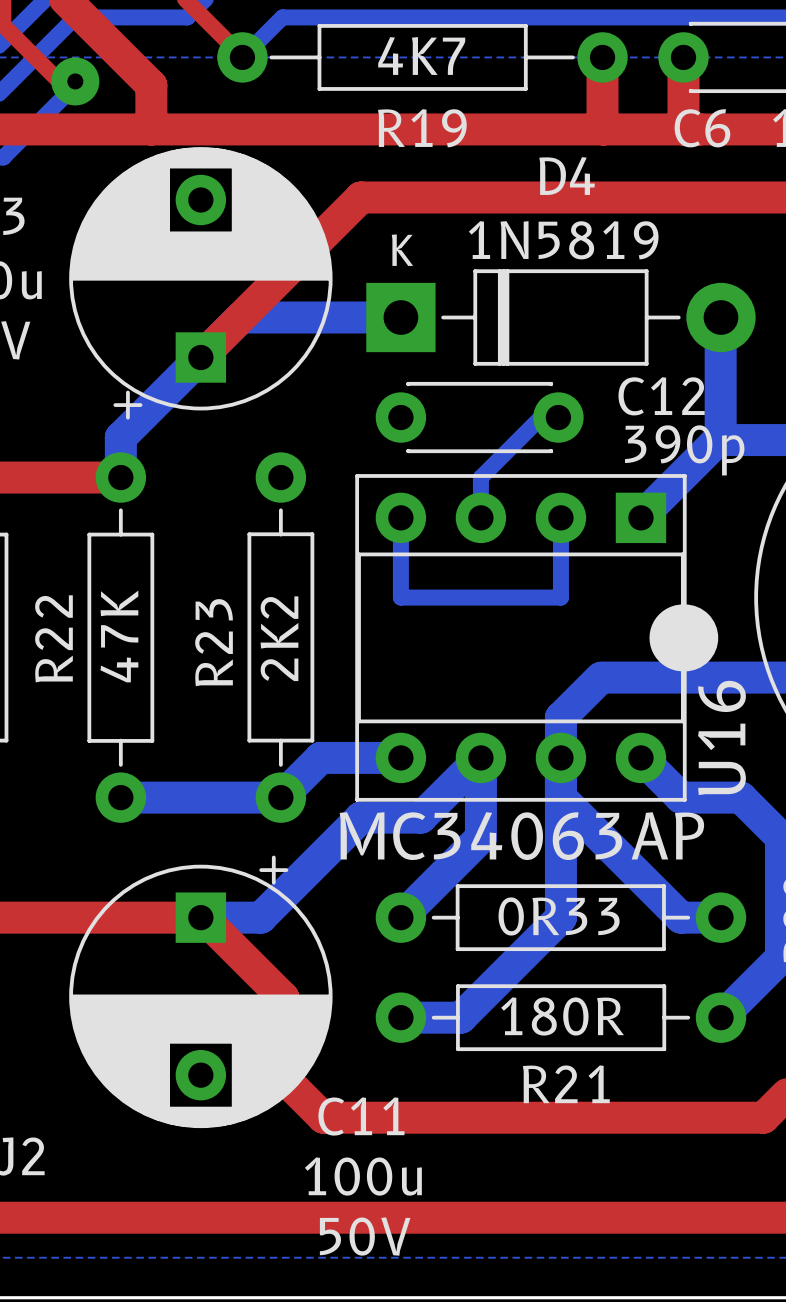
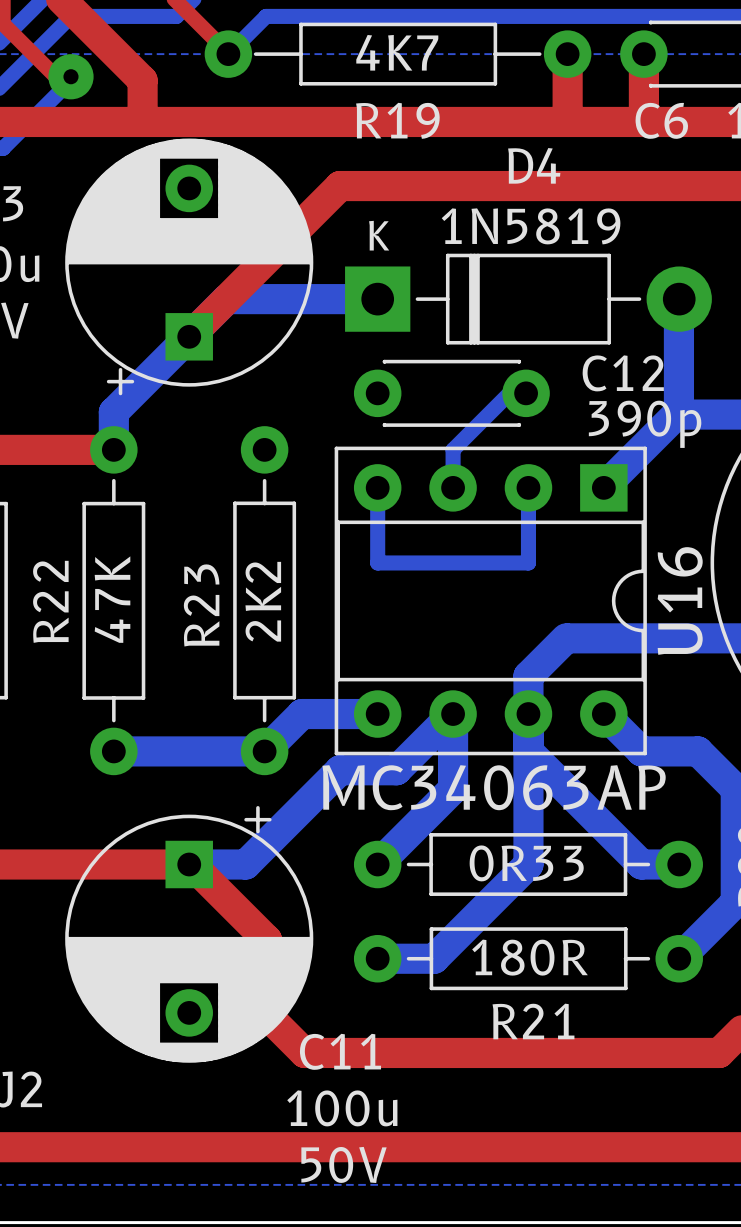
U16 footprint: [355, 474, 719, 802] -> [334, 446, 647, 756]
U16 name position: U16 (722, 737) -> U16 (680, 601)

